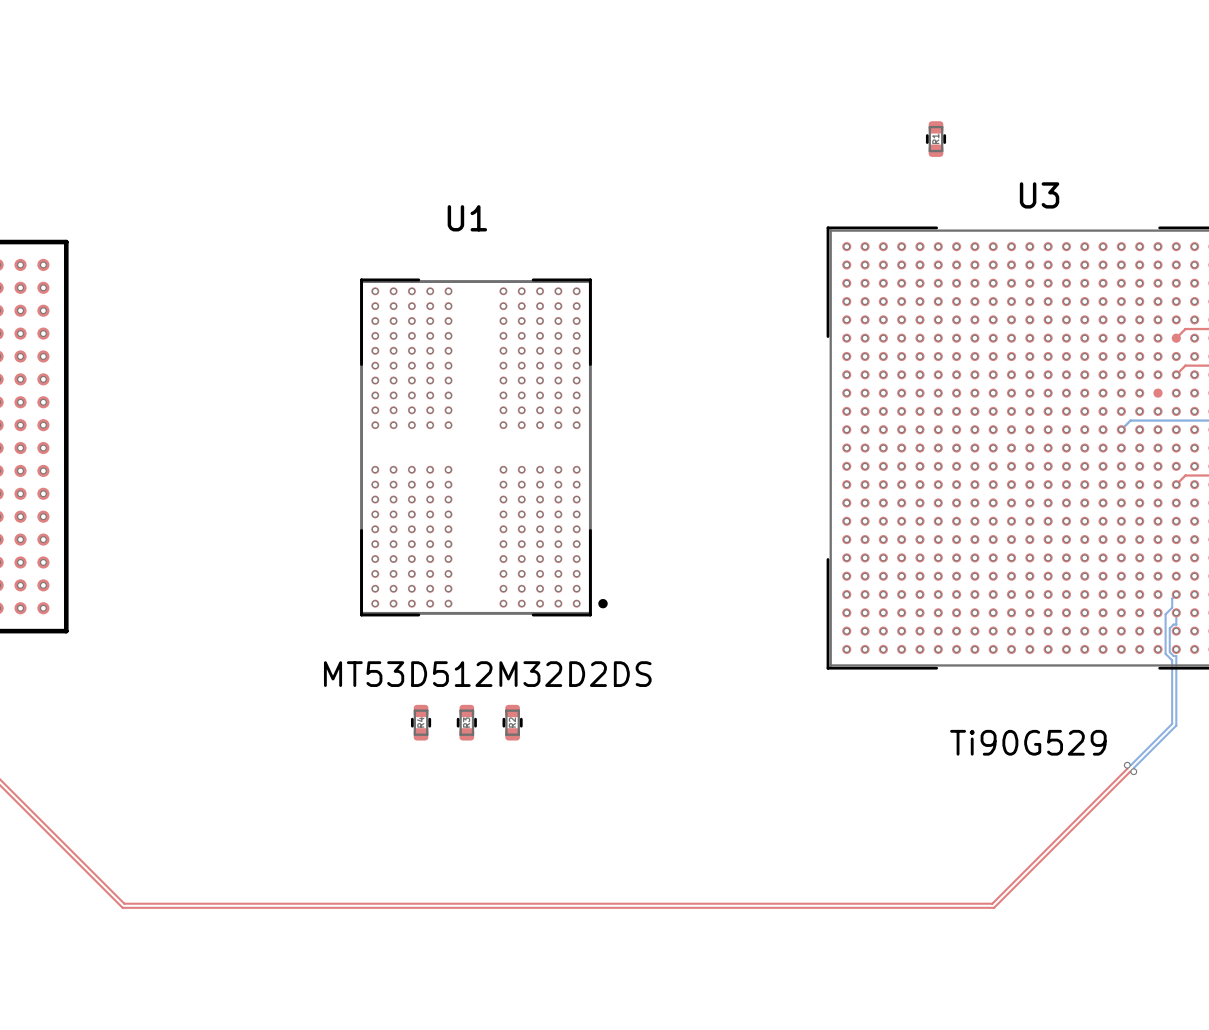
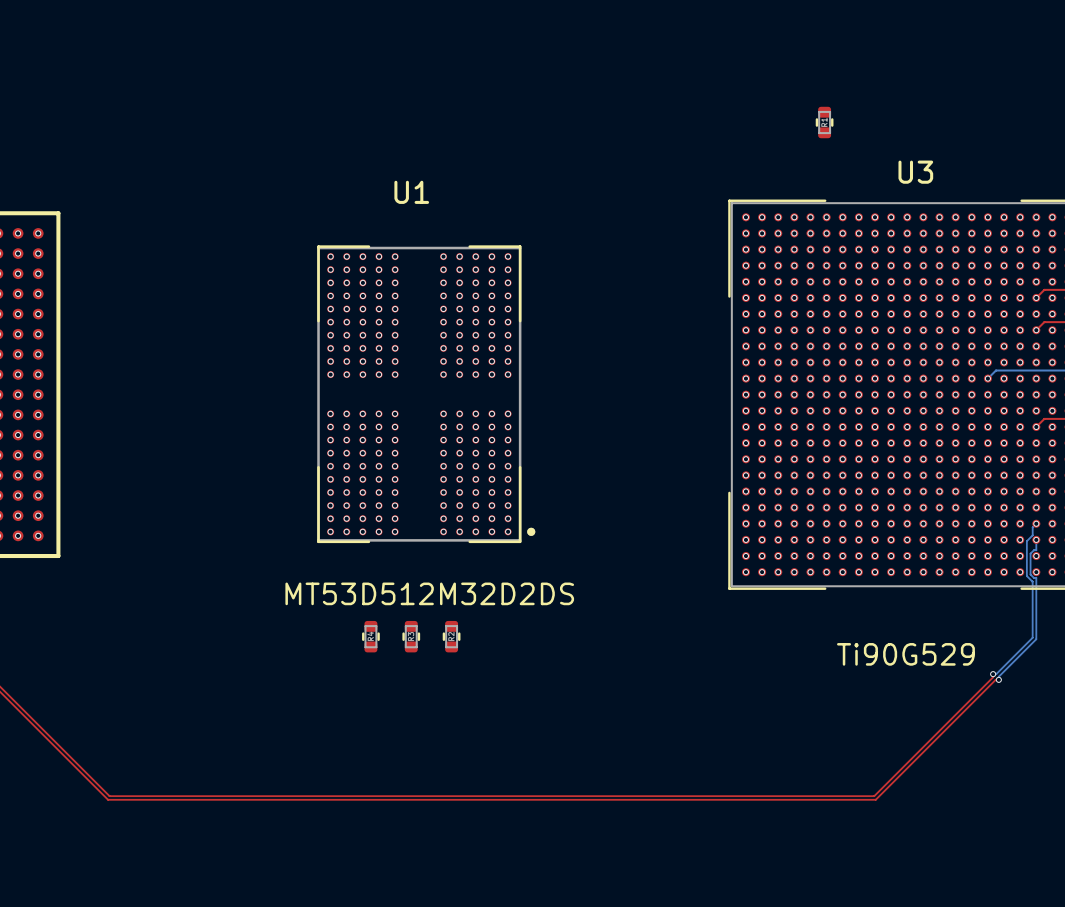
via: none -> (1036, 297)
via: none -> (1020, 346)

